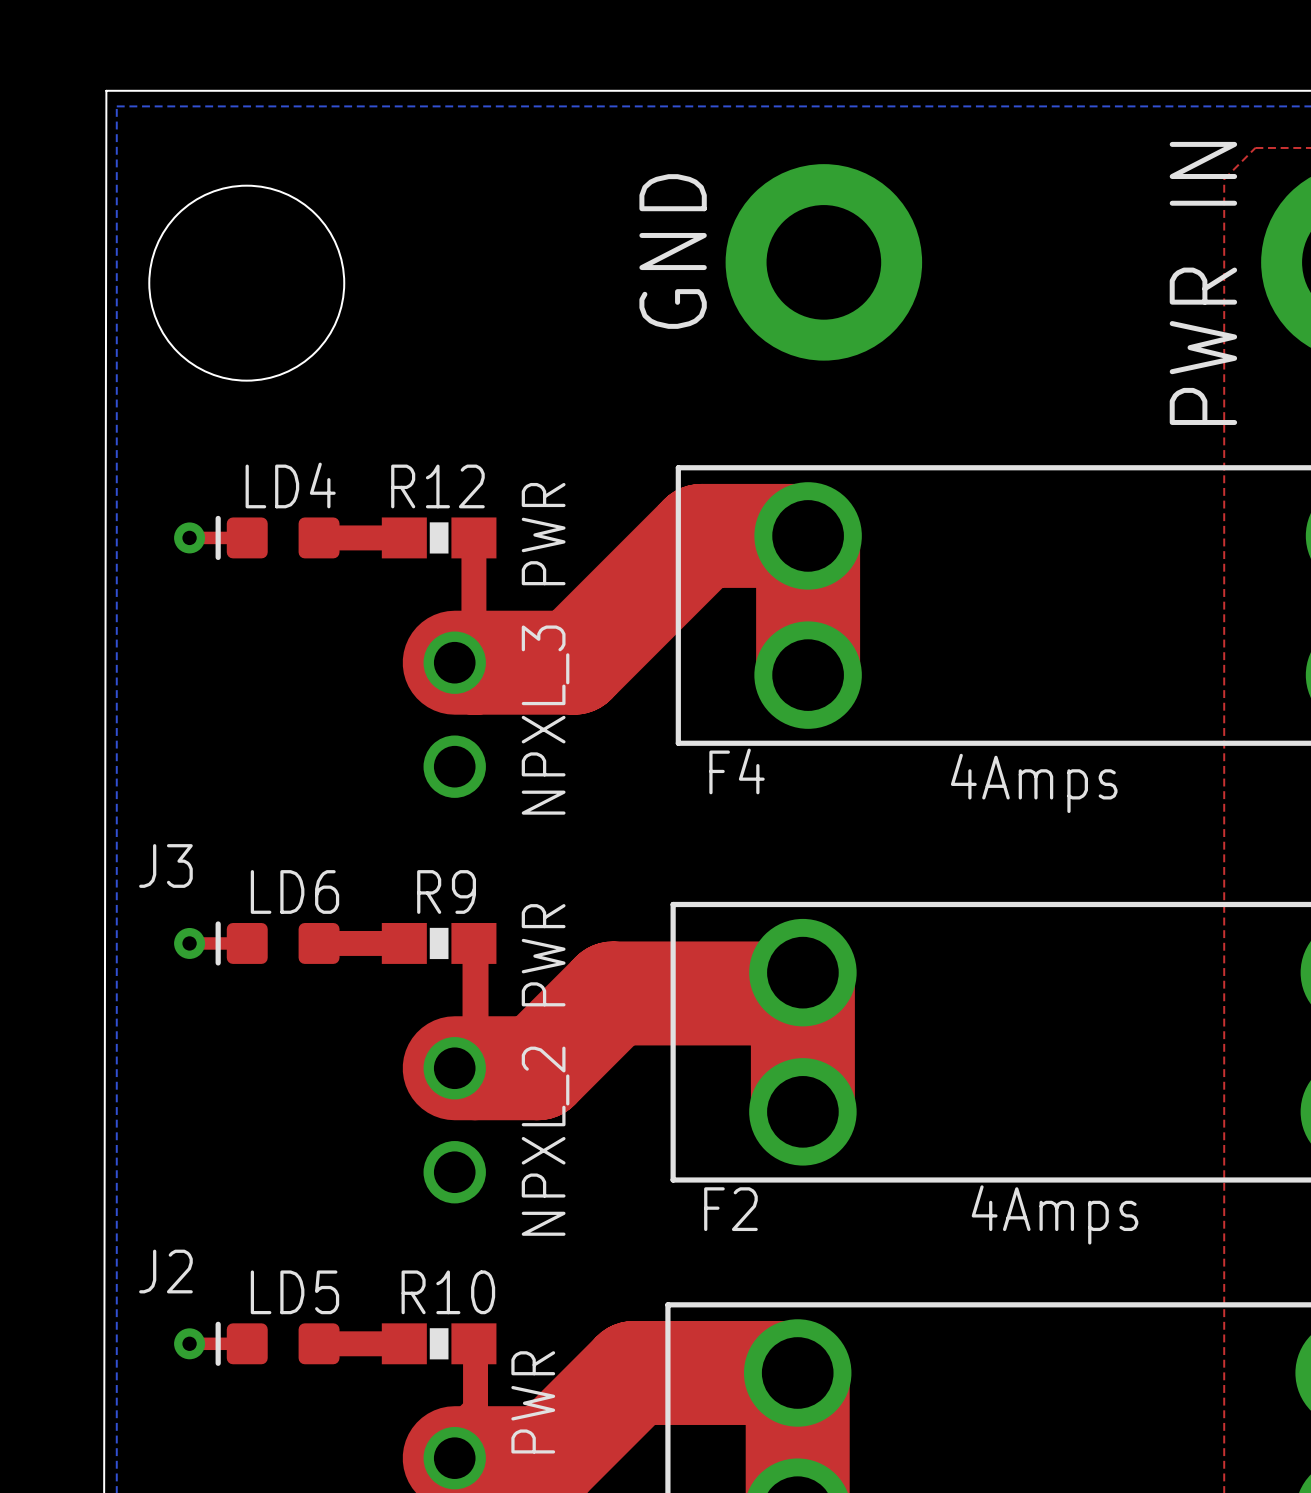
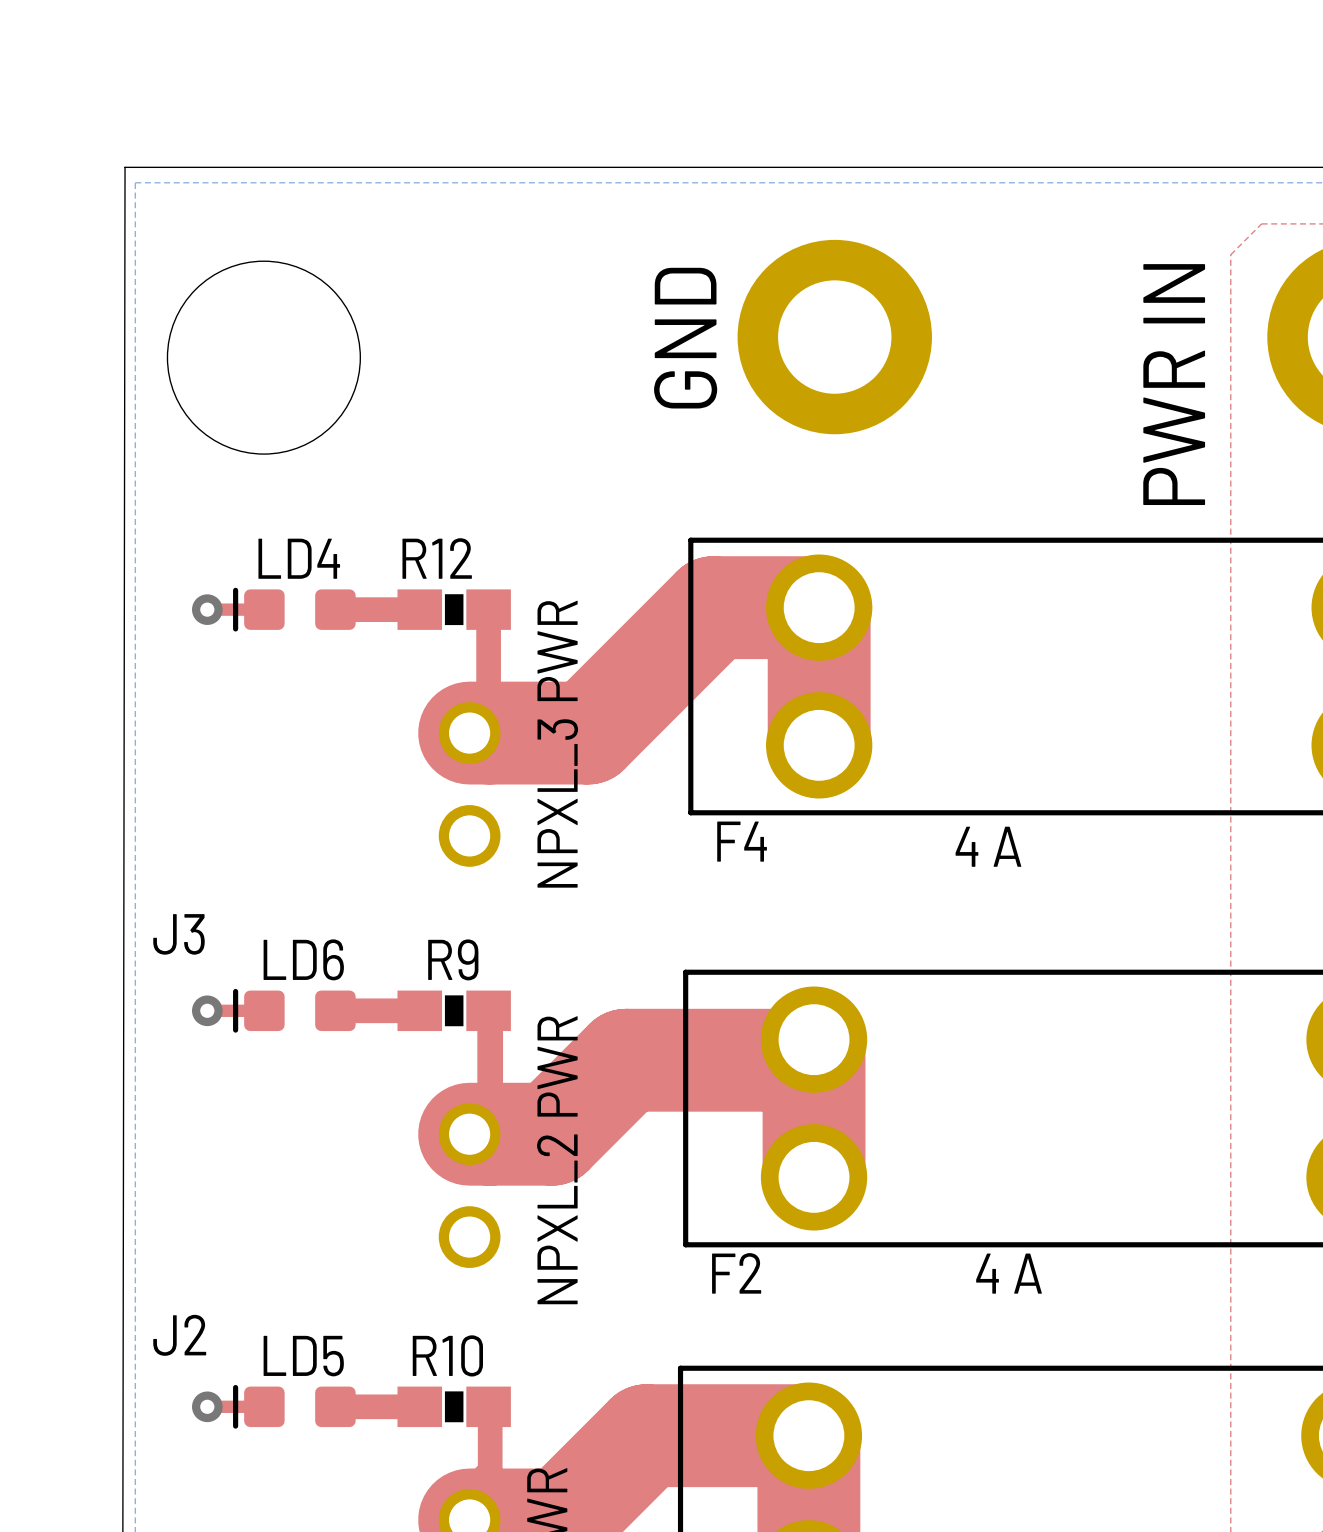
text position: PWR IN (1203, 283) -> PWR IN (1174, 384)
text: 4Amps (1034, 783) -> 4 A (988, 846)
text: 4Amps (1055, 1214) -> 4 A (1009, 1273)

